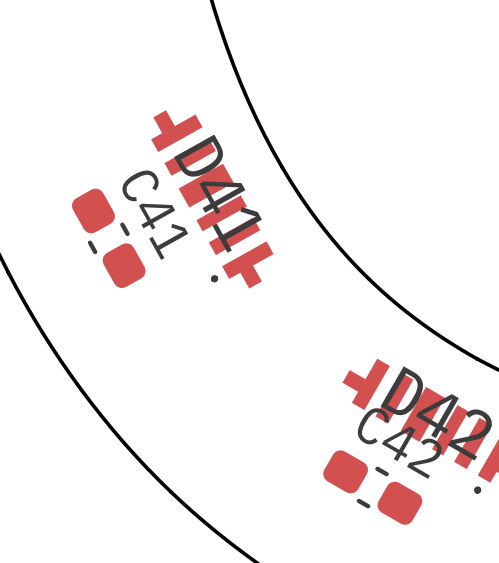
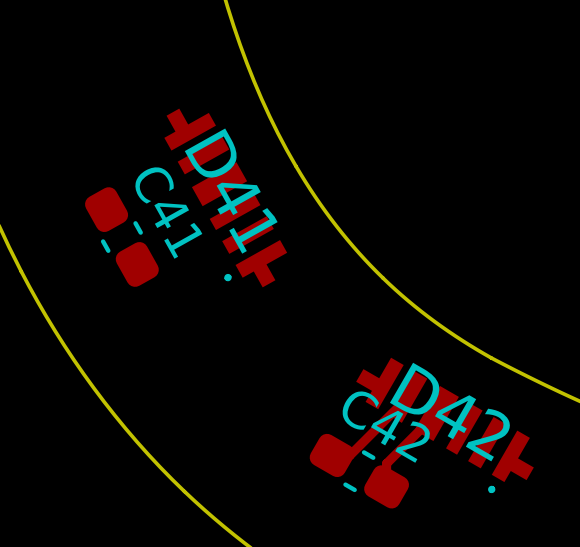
track: none -> (408, 397) (349, 455) (332, 455)
track: none -> (436, 413) (386, 463) (386, 486)
C42 position: (372, 487) -> (359, 471)

